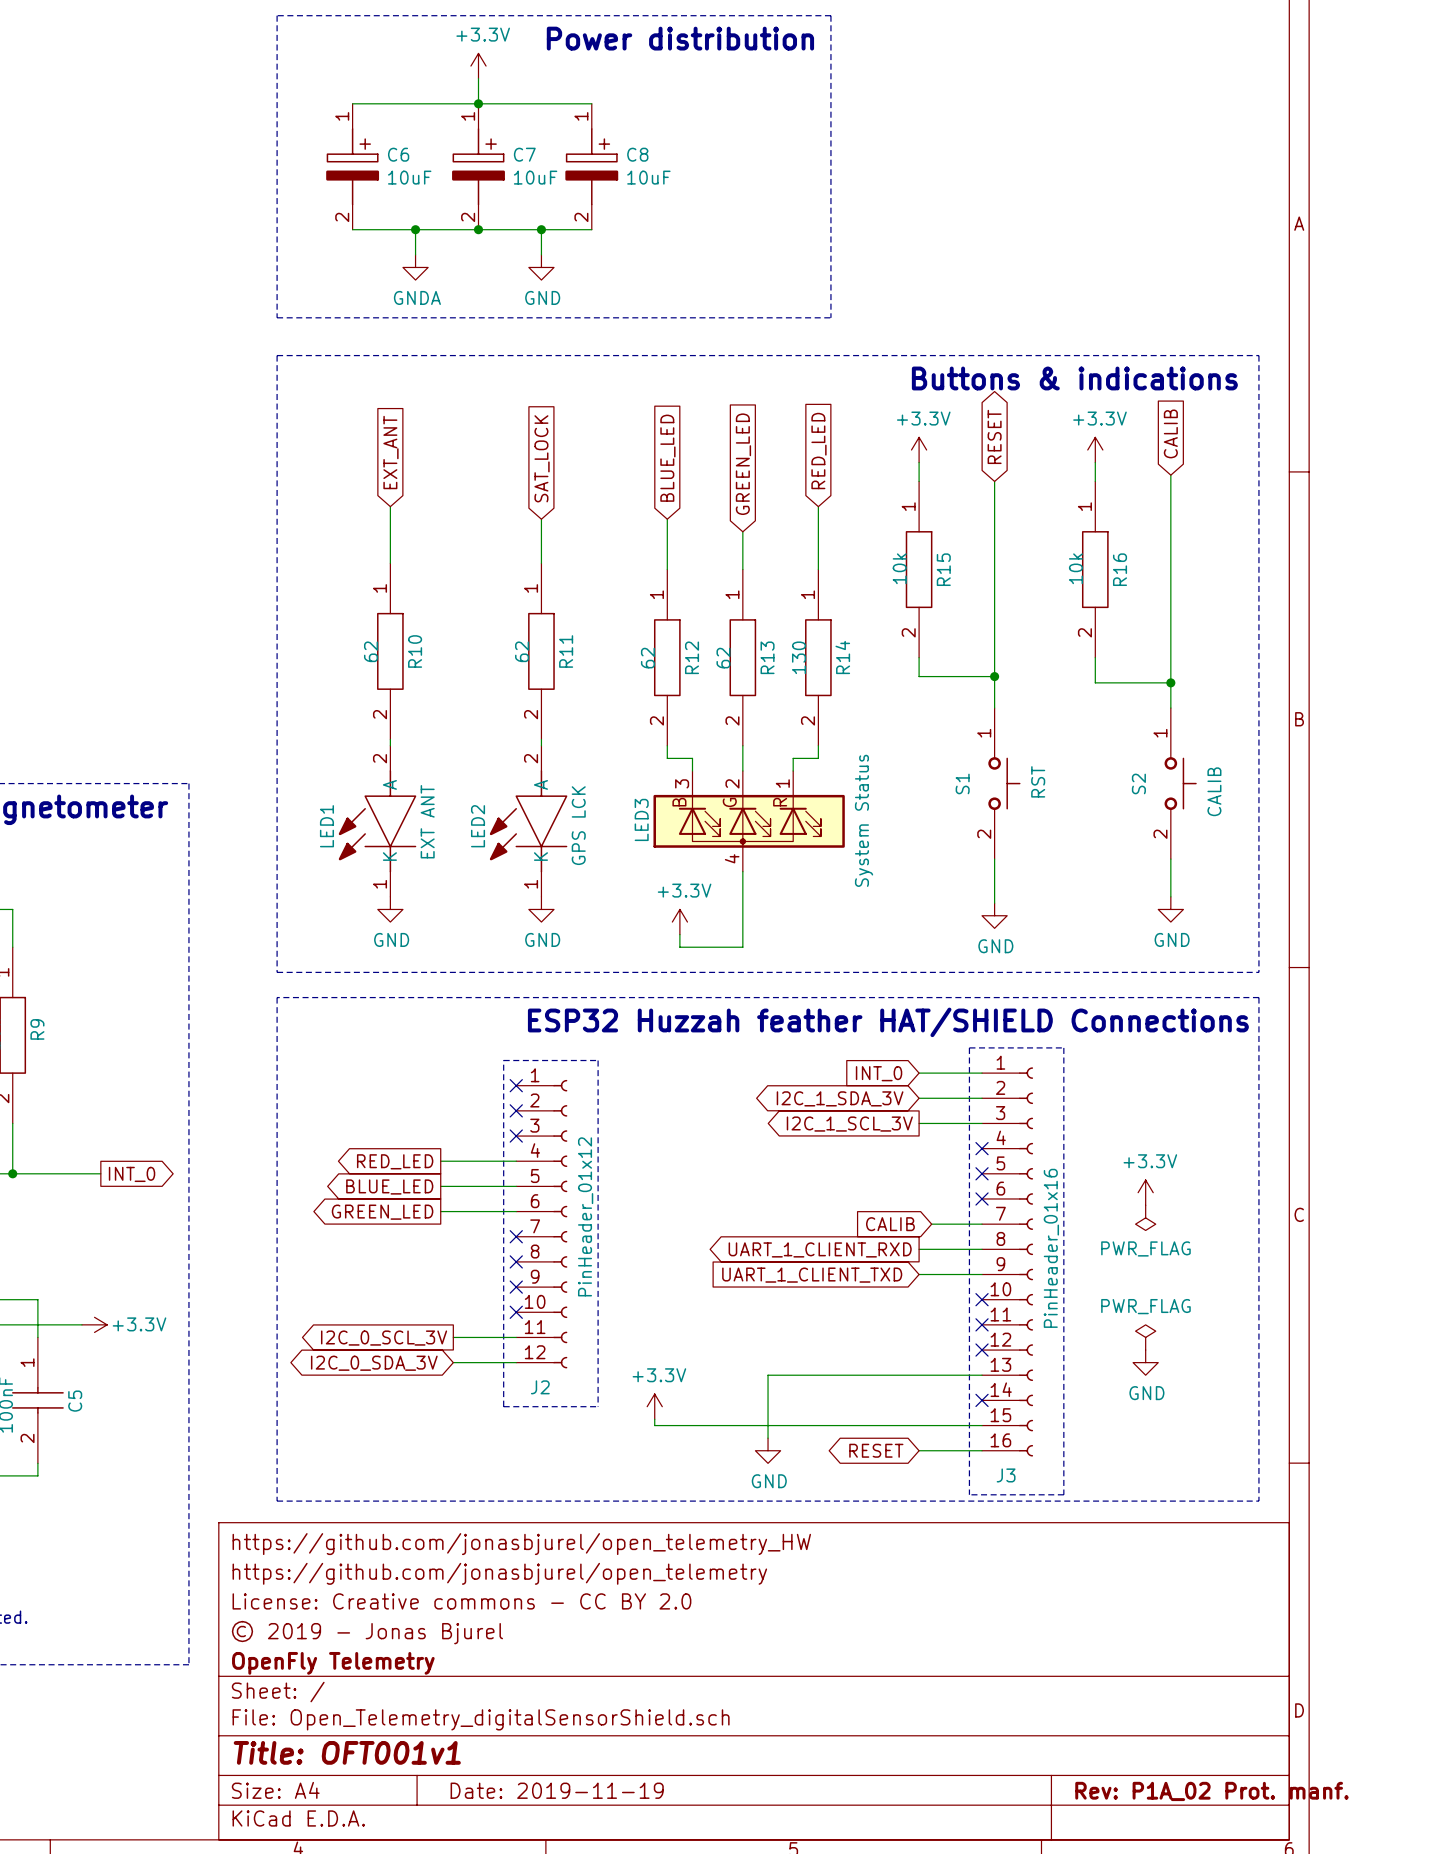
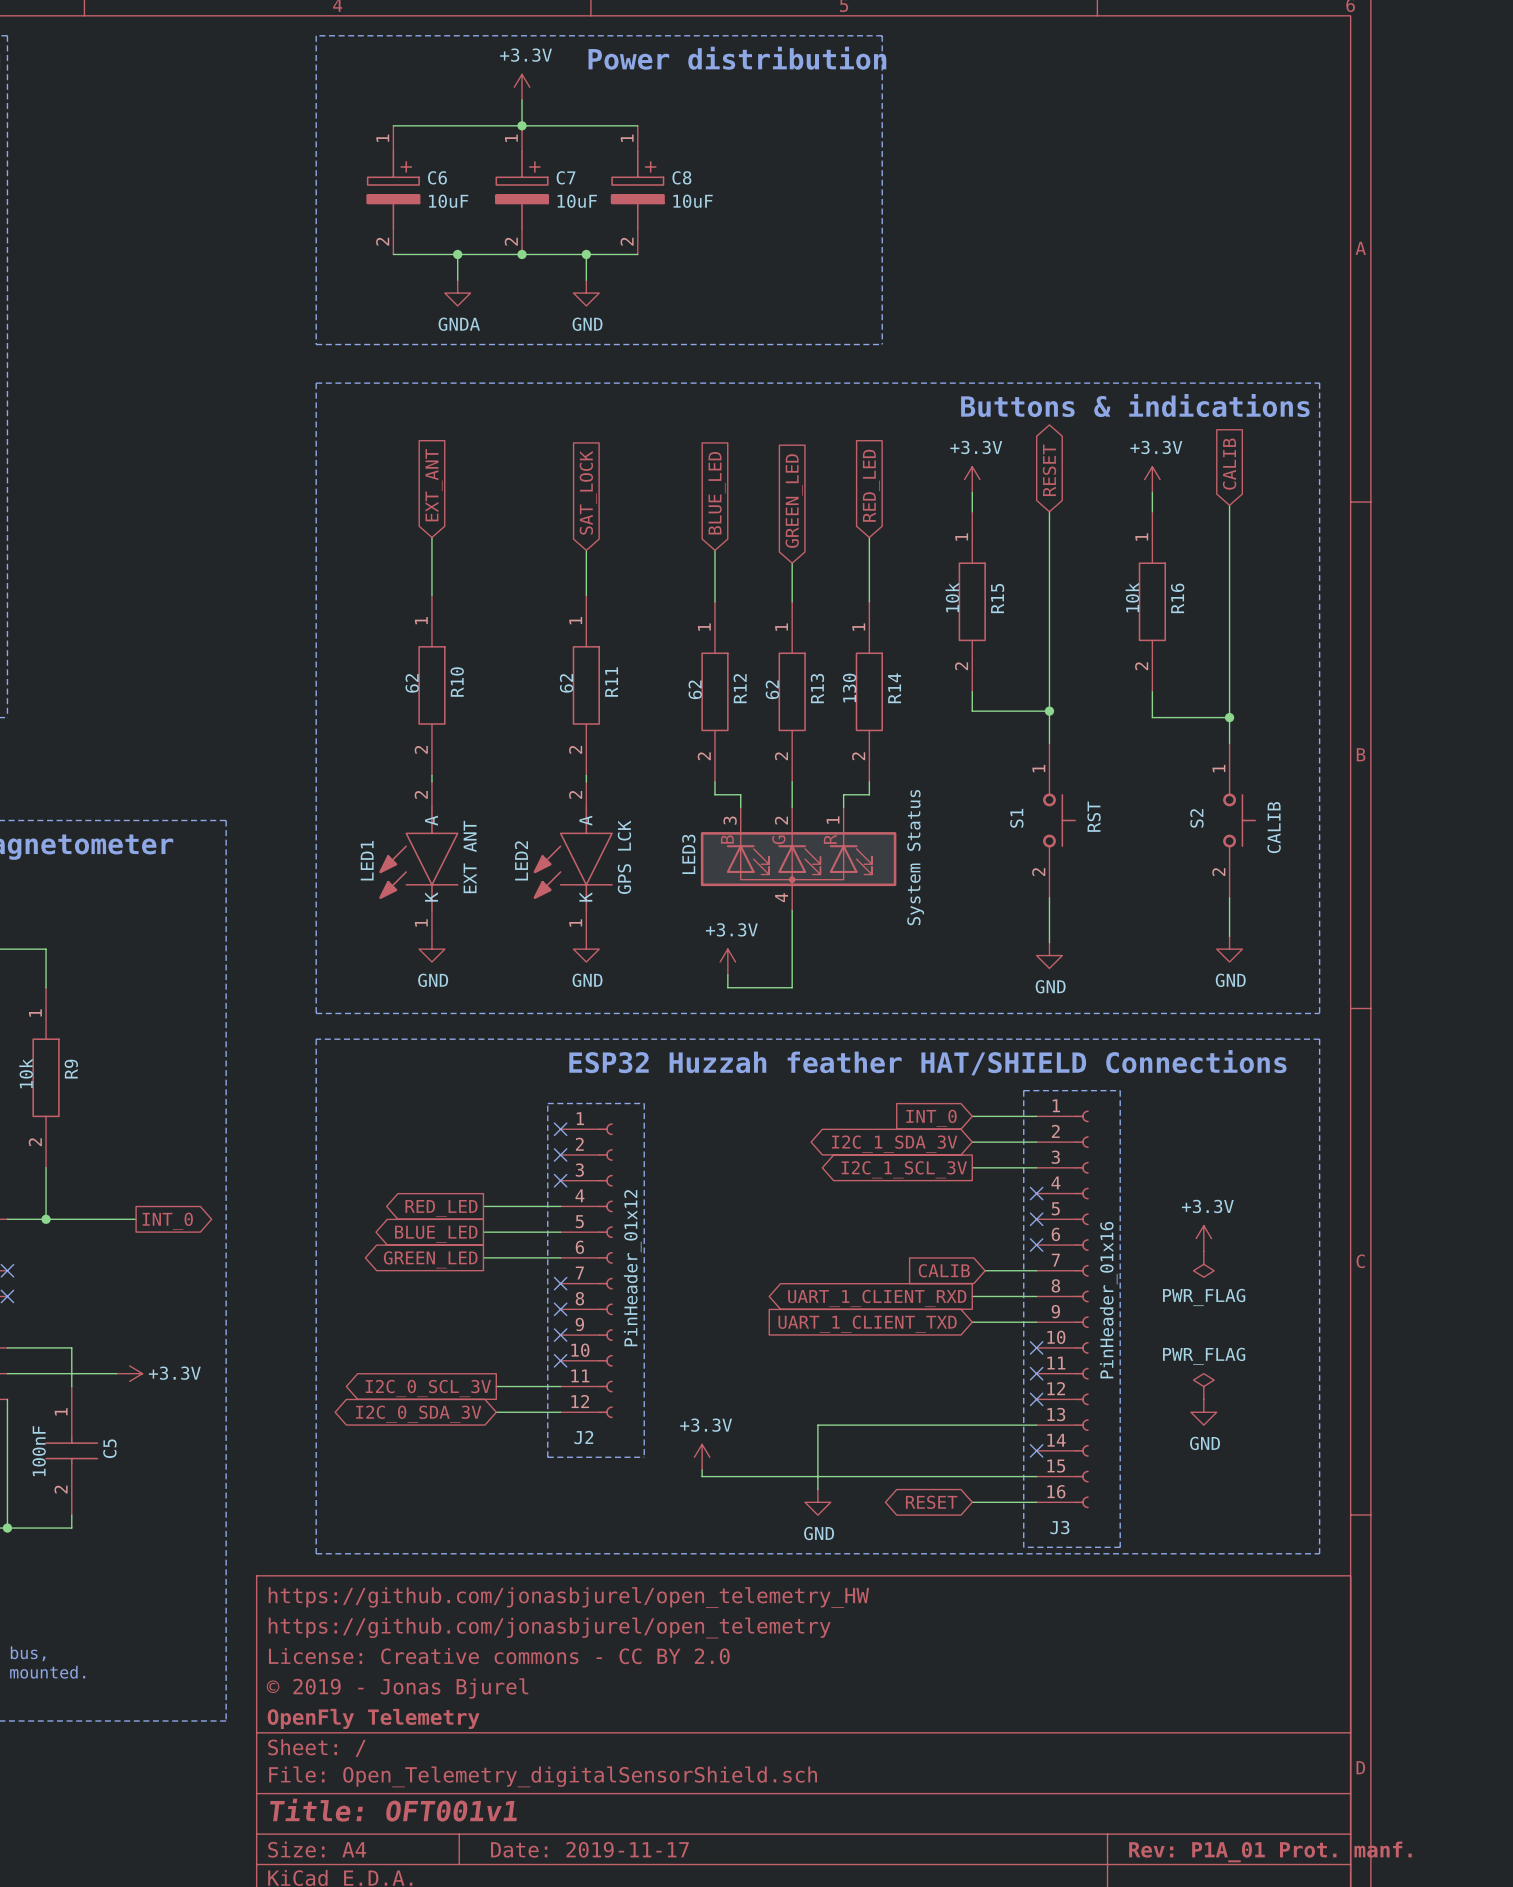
title block: Date: 2019-11-19 (557, 1790) -> Date: 2019-11-17 (589, 1849)
title block: Rev: P1A_02 Prot. manf. (1211, 1791) -> Rev: P1A_01 Prot. manf. (1270, 1851)

